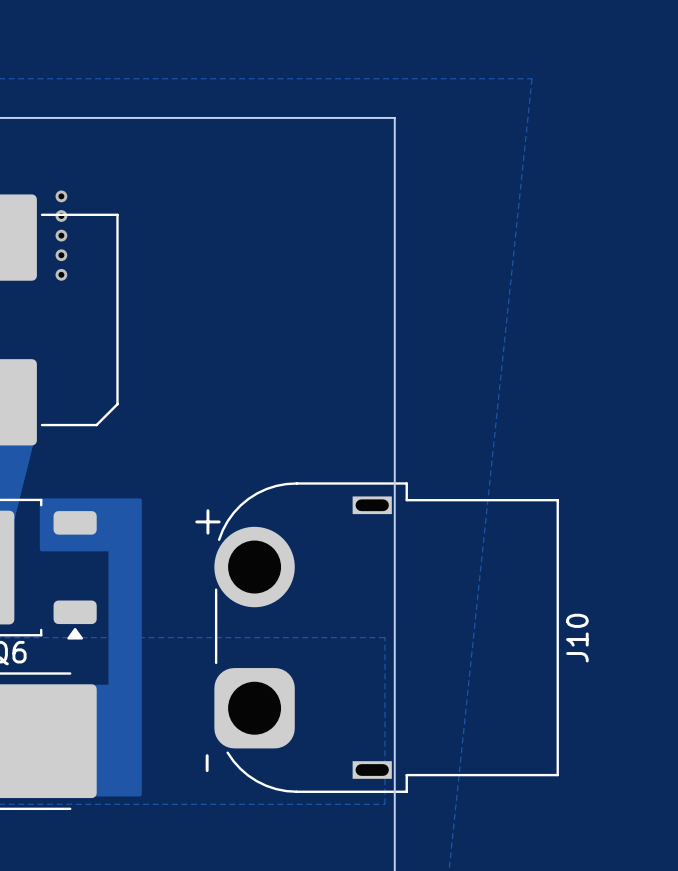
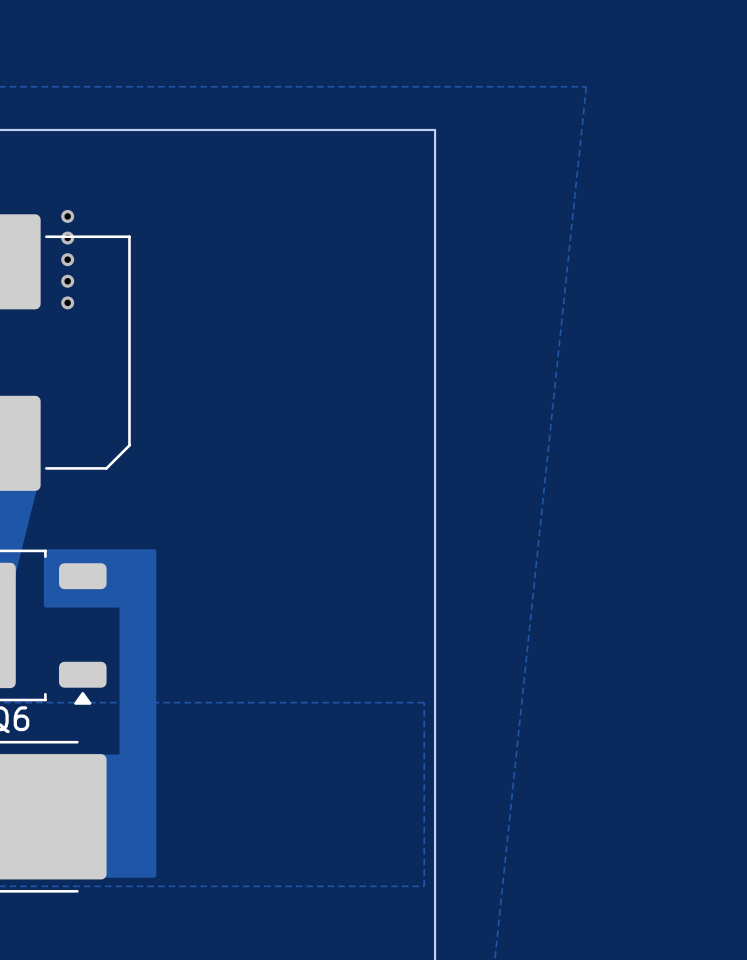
J10: (386, 637) -> none

